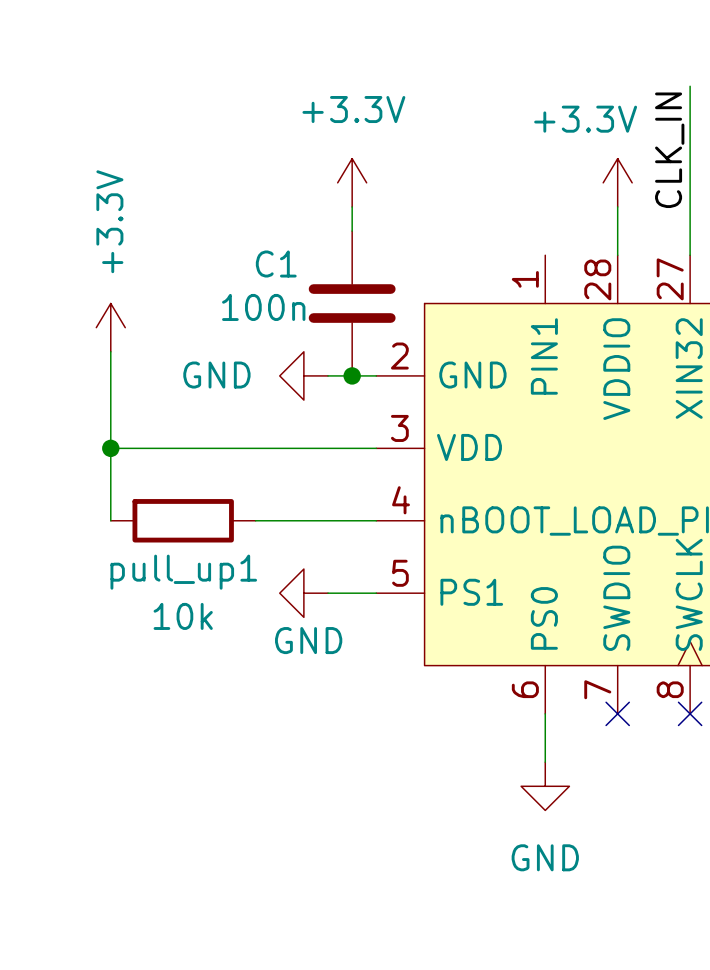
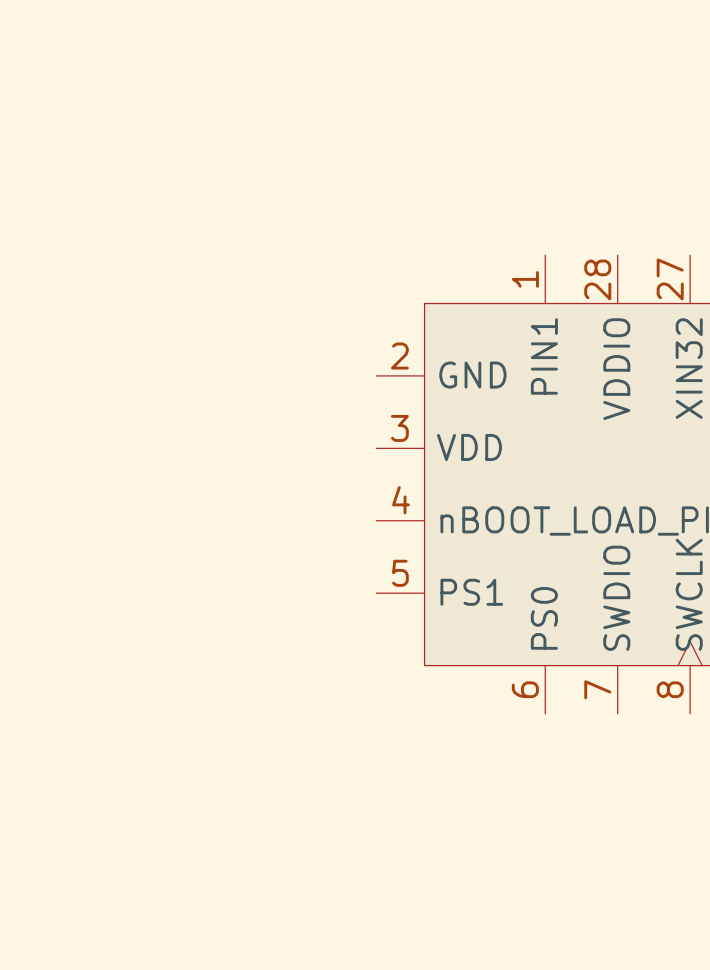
wire: (690, 86) (690, 255) -> none
label: CLK_IN (669, 150) -> none
power symbol: +3.3V (352, 182) -> none
power symbol: +3.3V (617, 182) -> none
wire: (352, 206) (352, 231) -> none
wire: (617, 206) (617, 255) -> none
C1: 100n (352, 303) -> none
power symbol: +3.3V (110, 327) -> none
wire: (110, 351) (110, 520) -> none
power symbol: GND (303, 375) -> none
wire: (328, 375) (376, 375) -> none
junction: (352, 375) -> none
wire: (110, 448) (376, 448) -> none
junction: (110, 448) -> none
pull_up1: 10k (183, 520) -> none
wire: (255, 520) (376, 520) -> none
power symbol: GND (303, 593) -> none
wire: (328, 593) (376, 593) -> none
wire: (545, 713) (545, 762) -> none
no-connect mark: (617, 713) -> none
no-connect mark: (690, 713) -> none
power symbol: GND (545, 786) -> none

